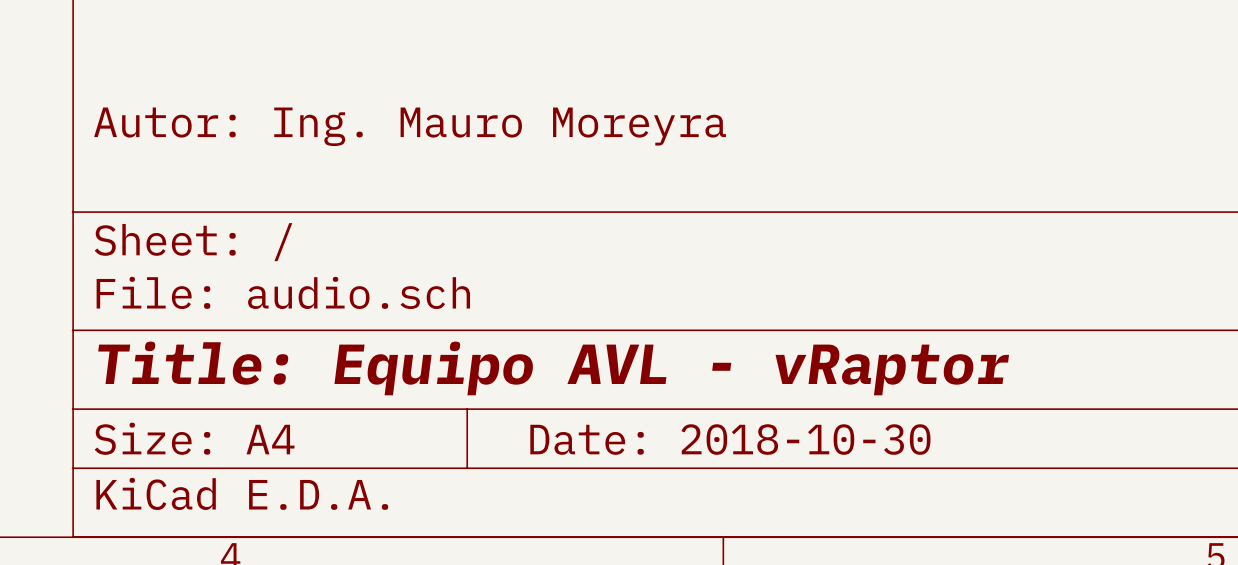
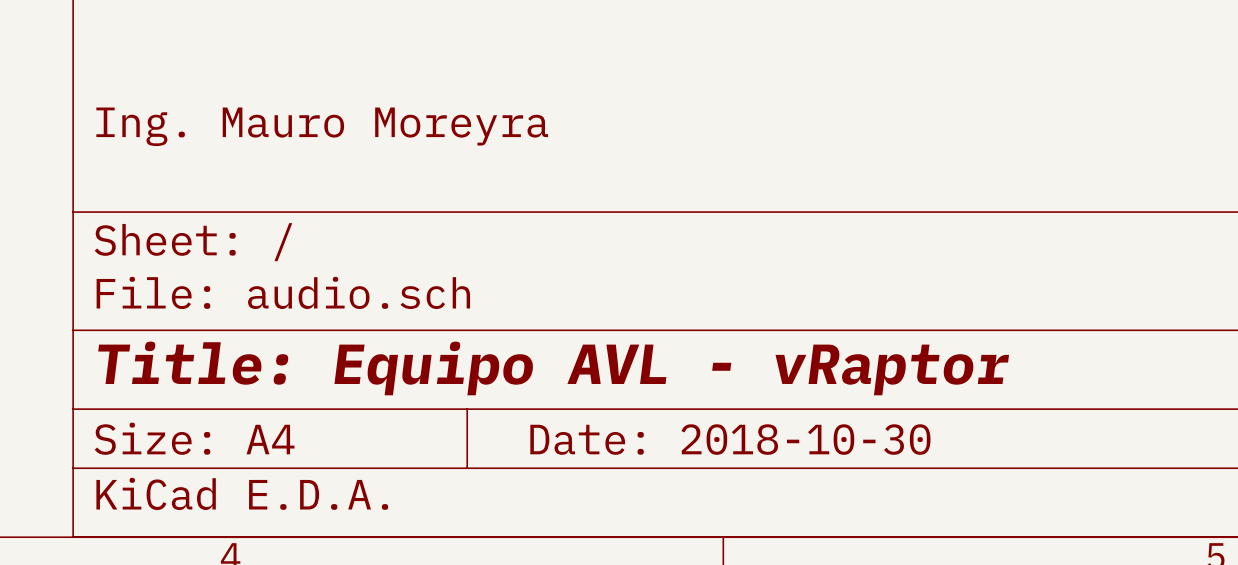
title block: Autor: Ing. Mauro Moreyra (410, 126) -> Ing. Mauro Moreyra (322, 126)

